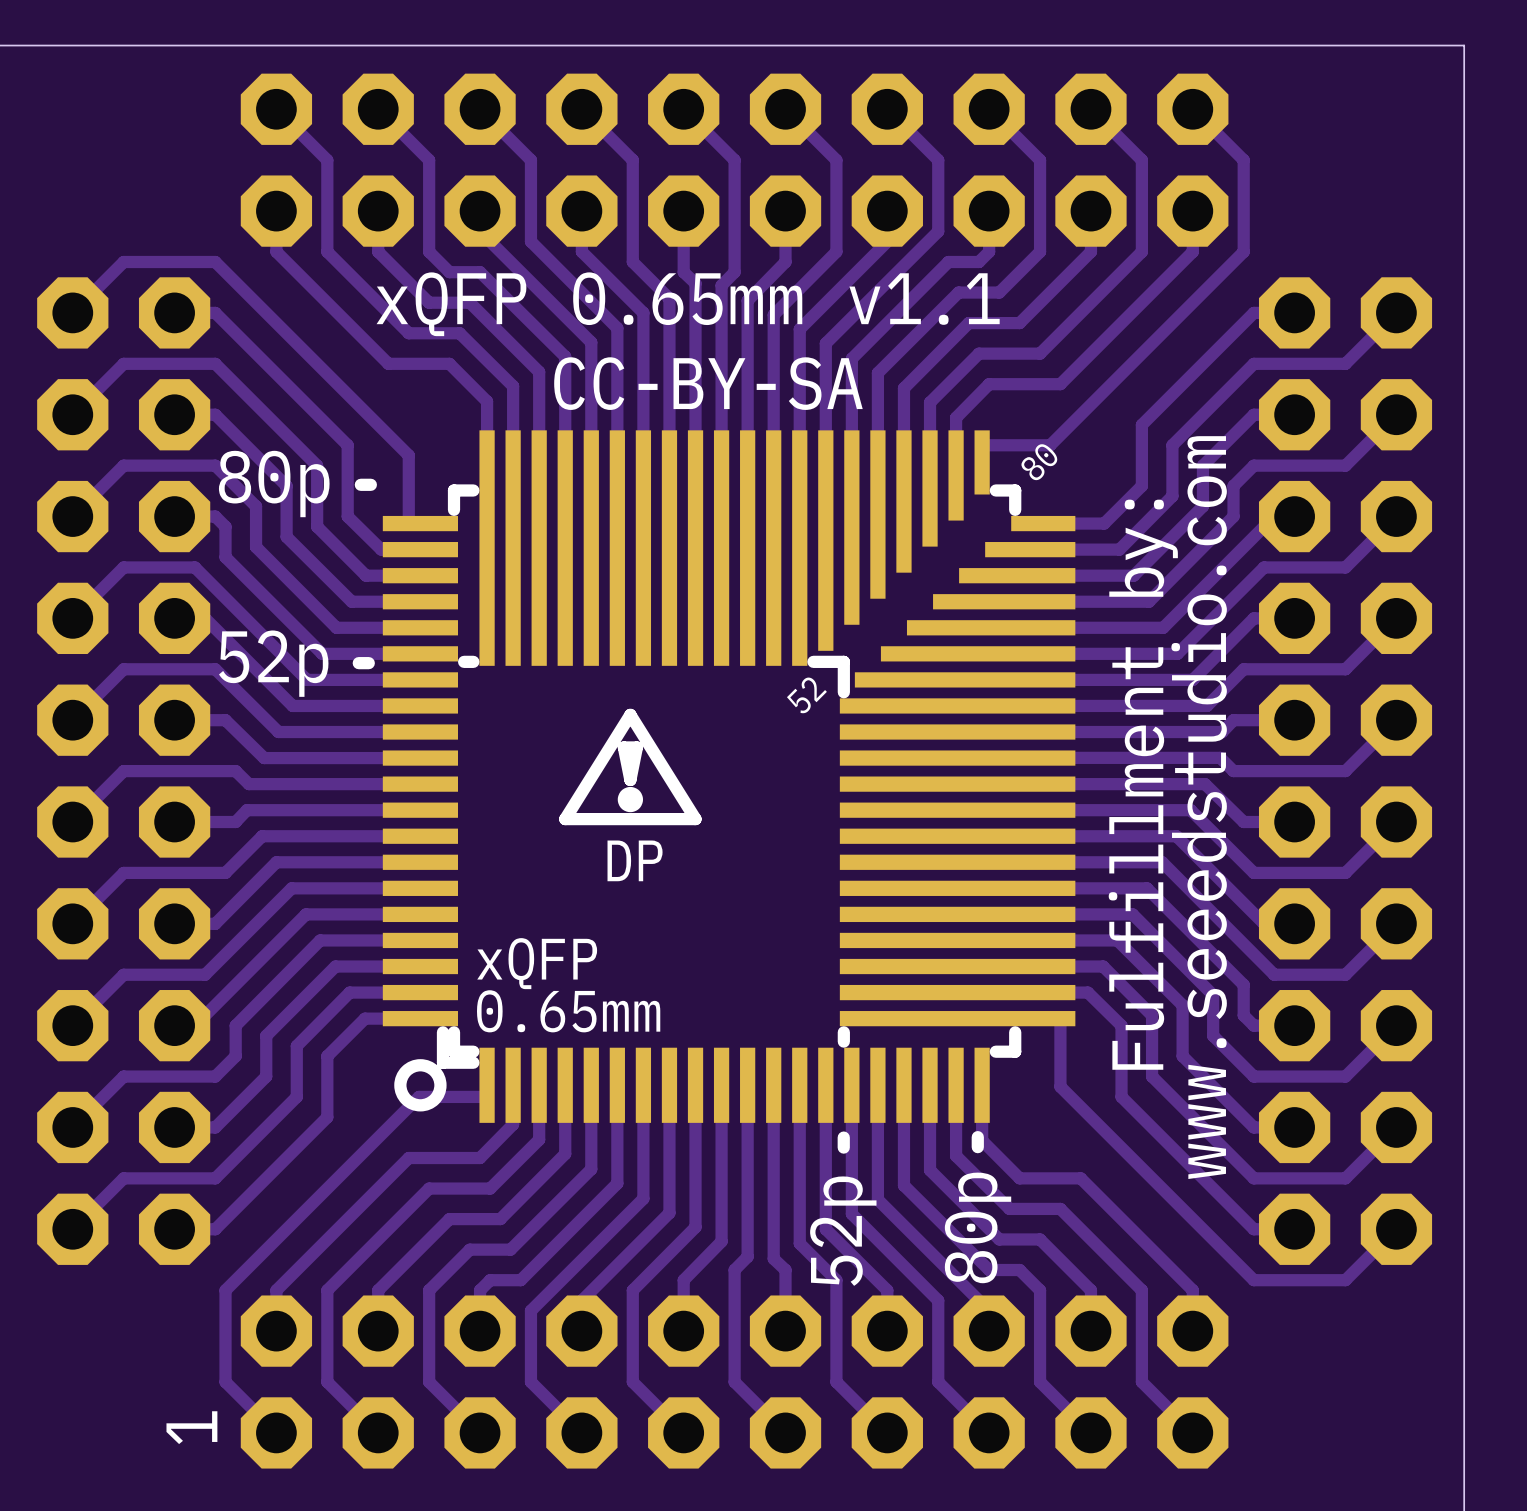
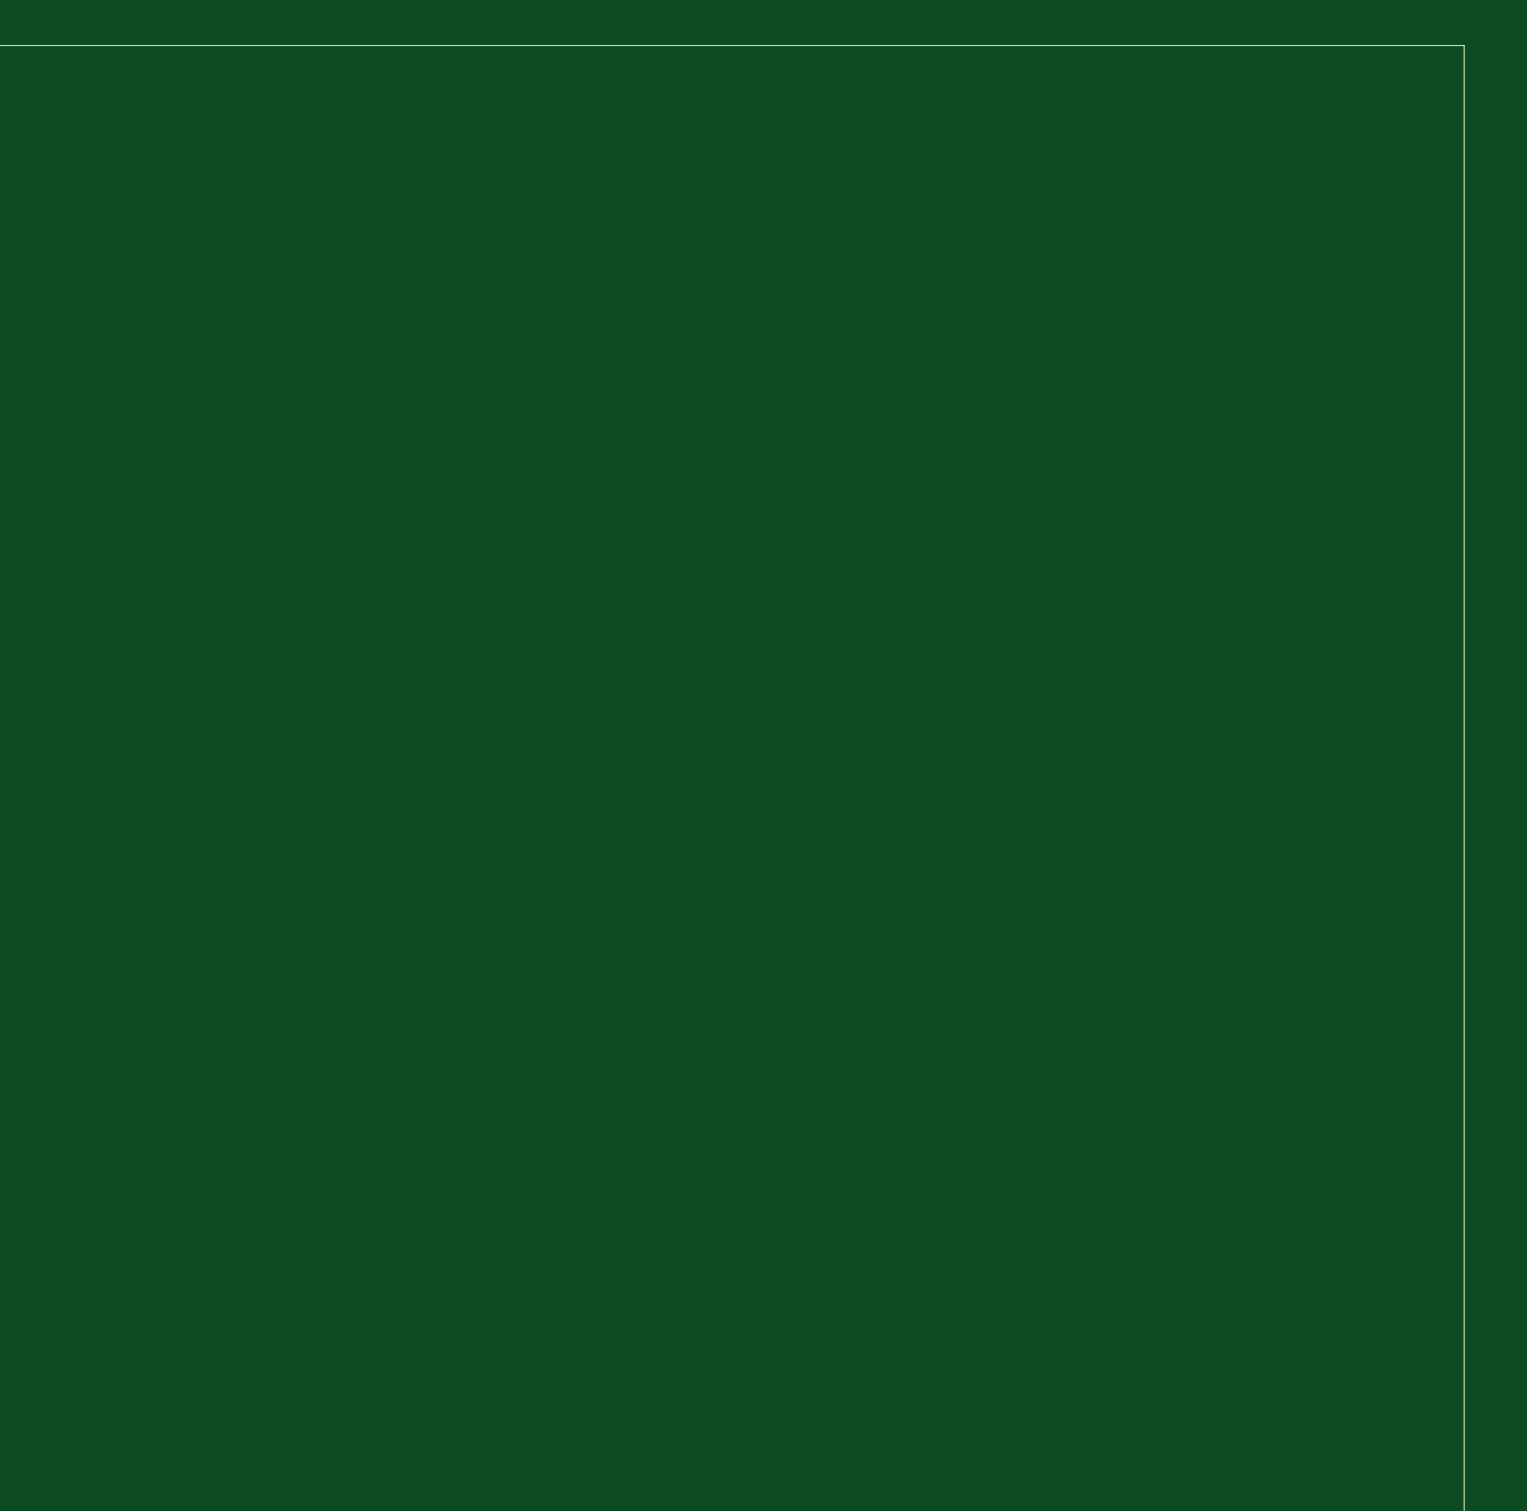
part: (734, 771) -> none

